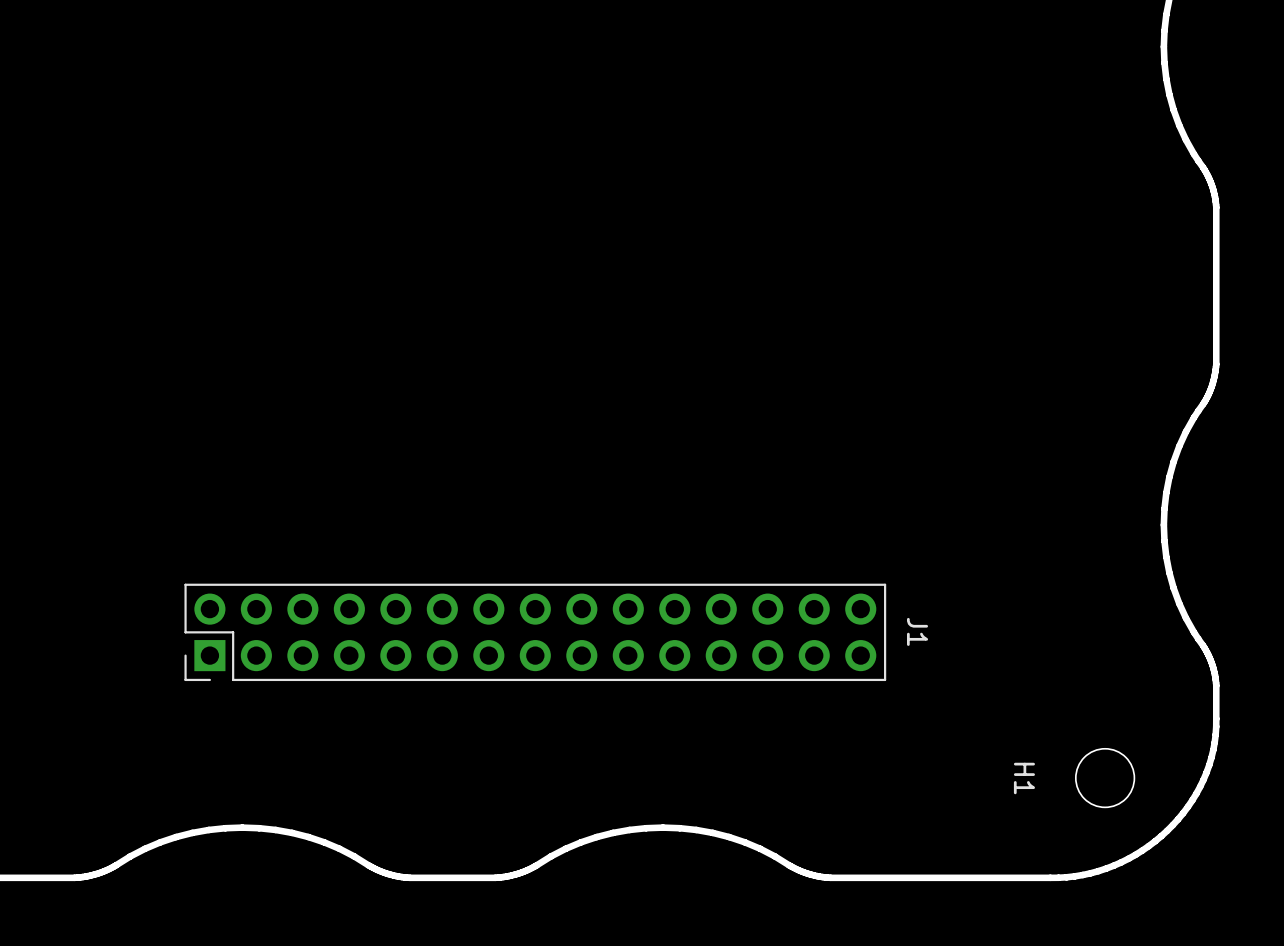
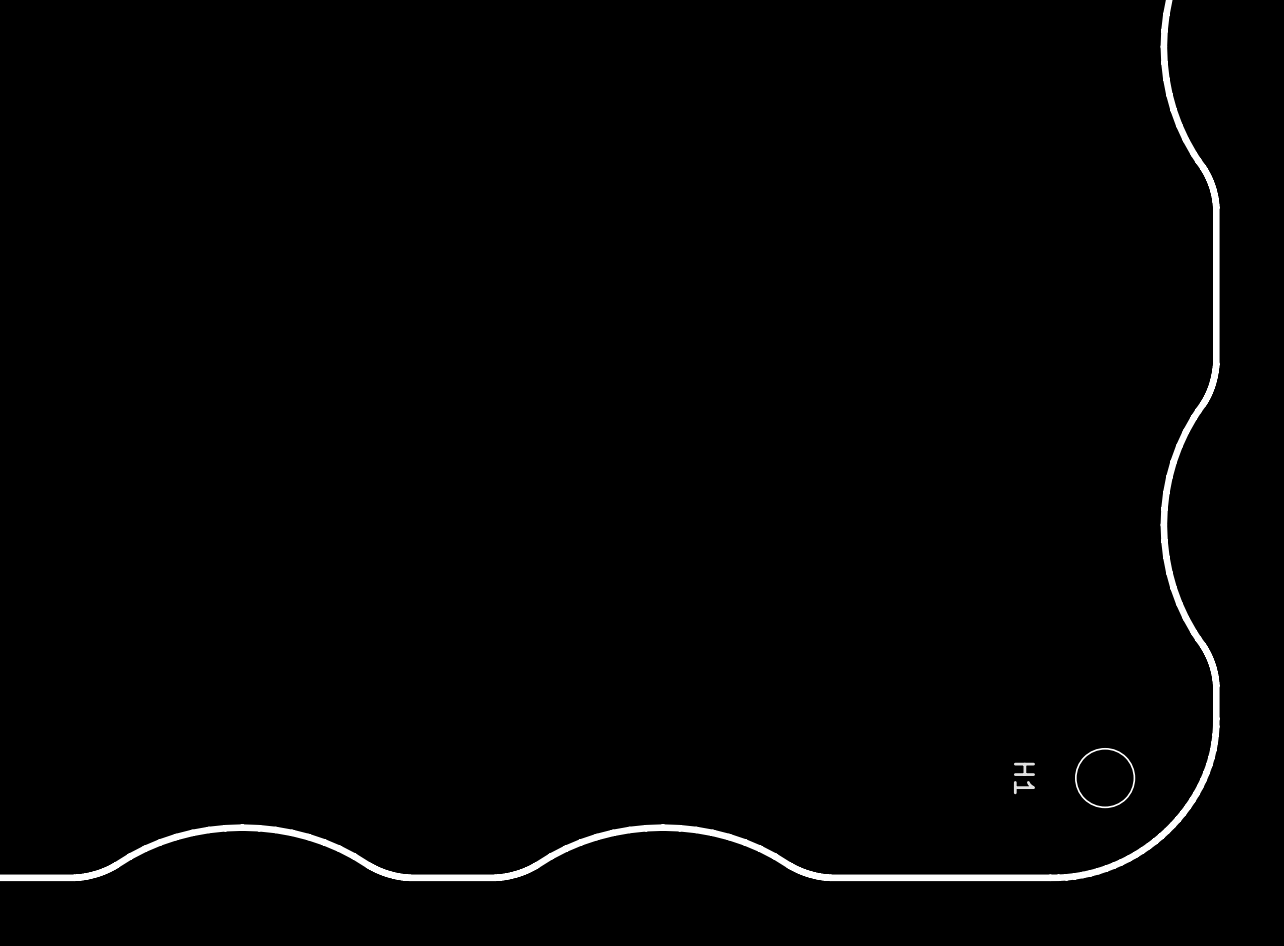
J1: (535, 632) -> none

